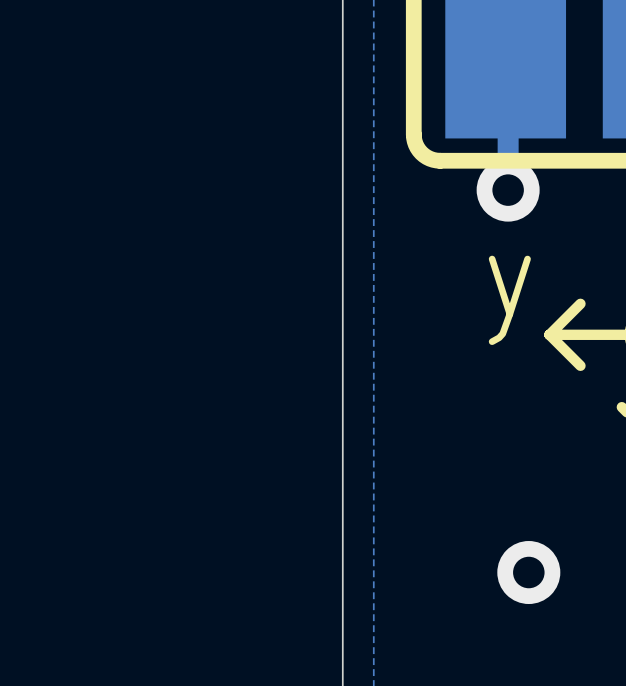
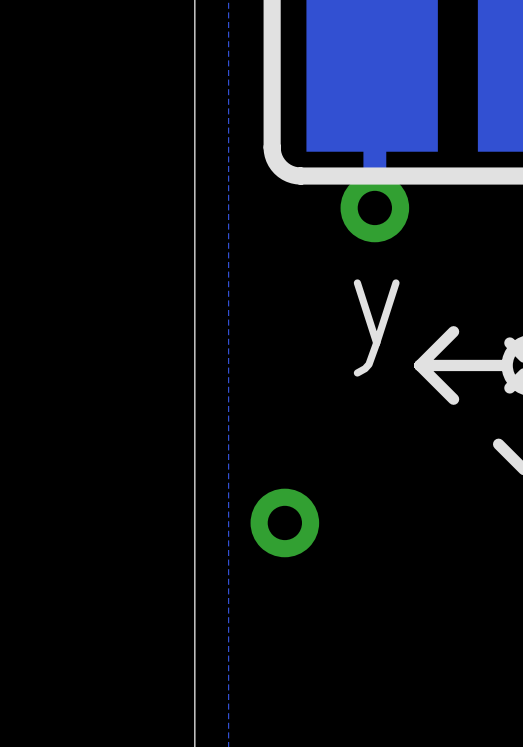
via: none -> (284, 522)
via: (528, 572) -> none

